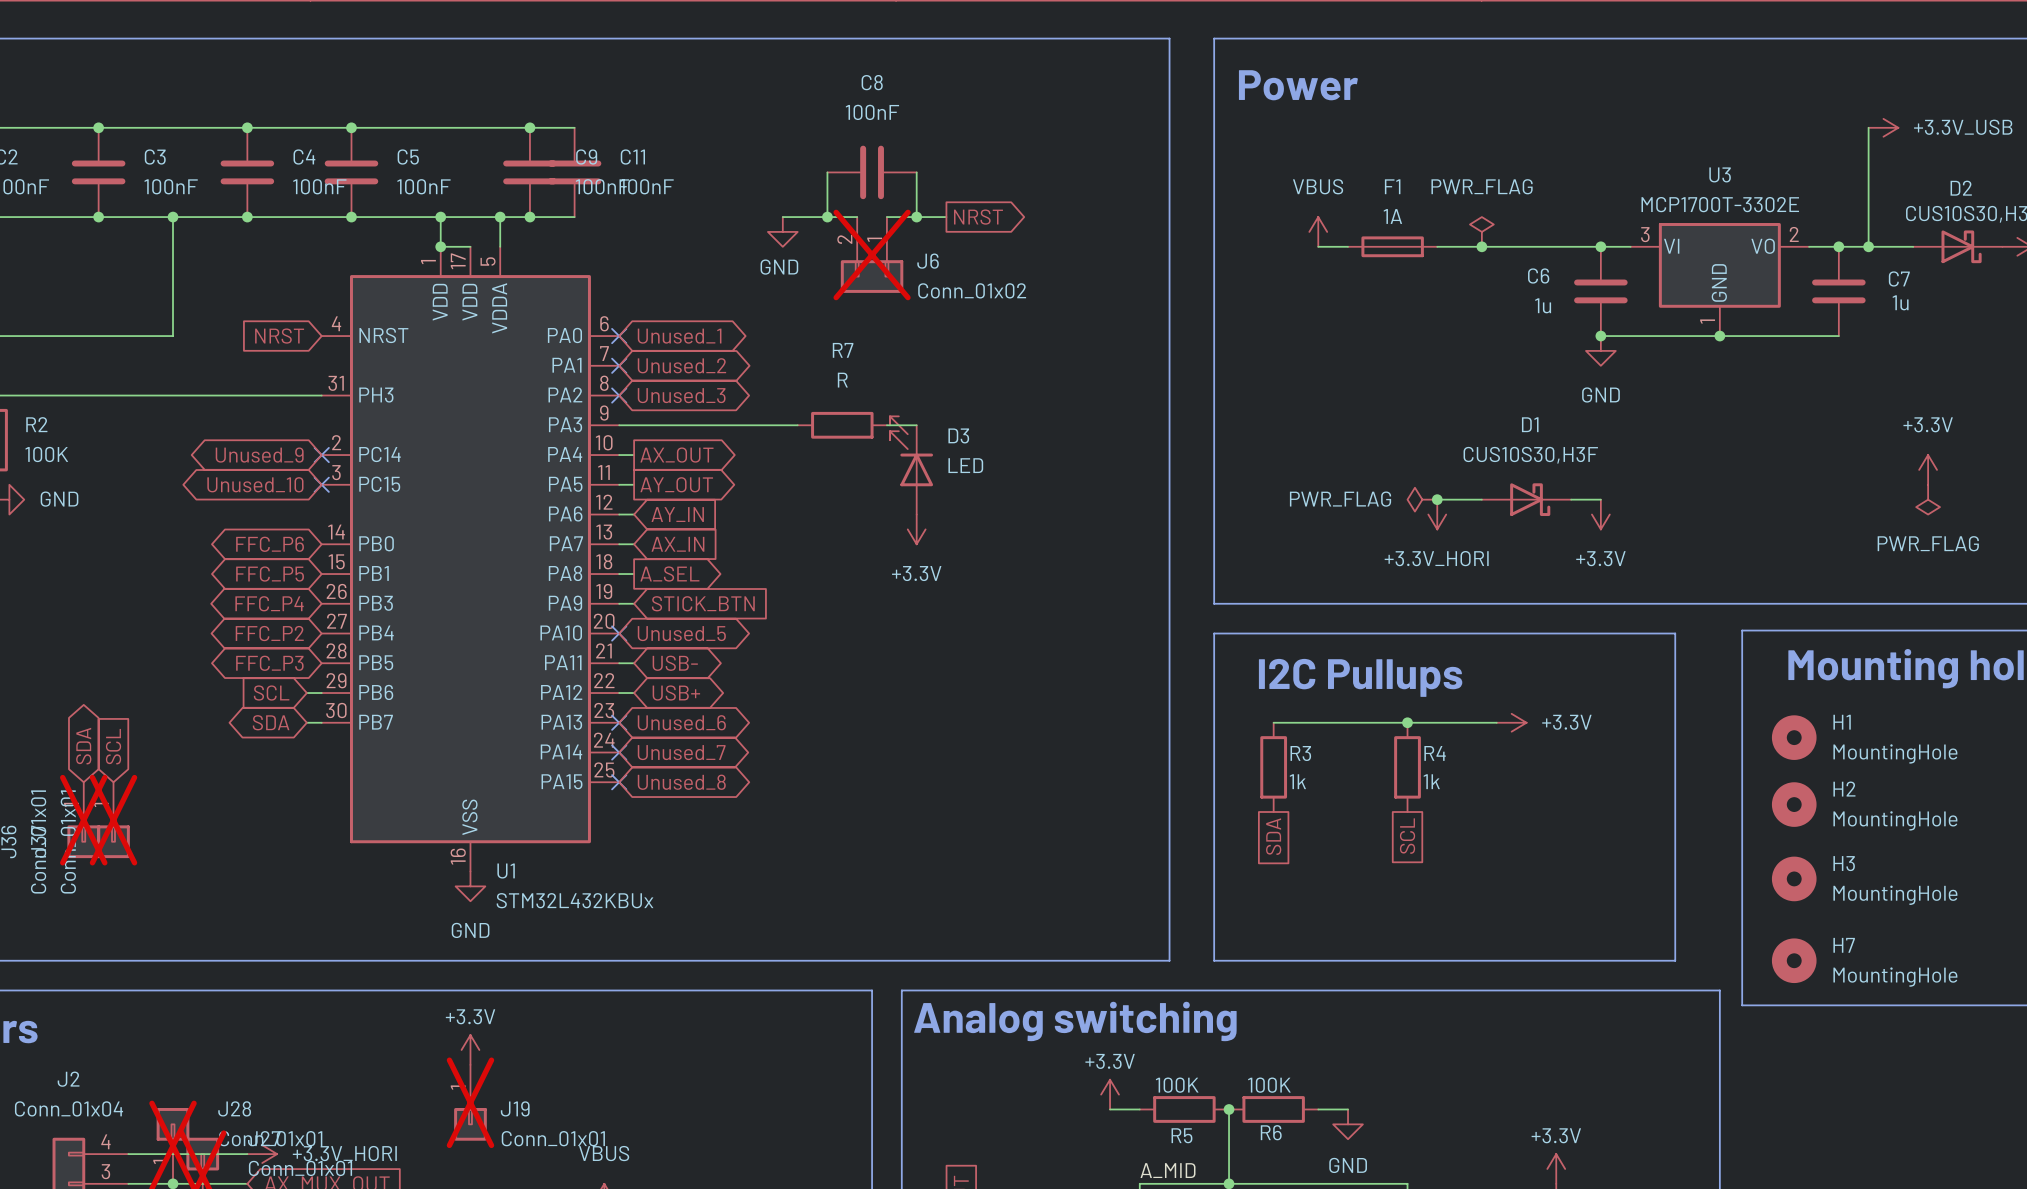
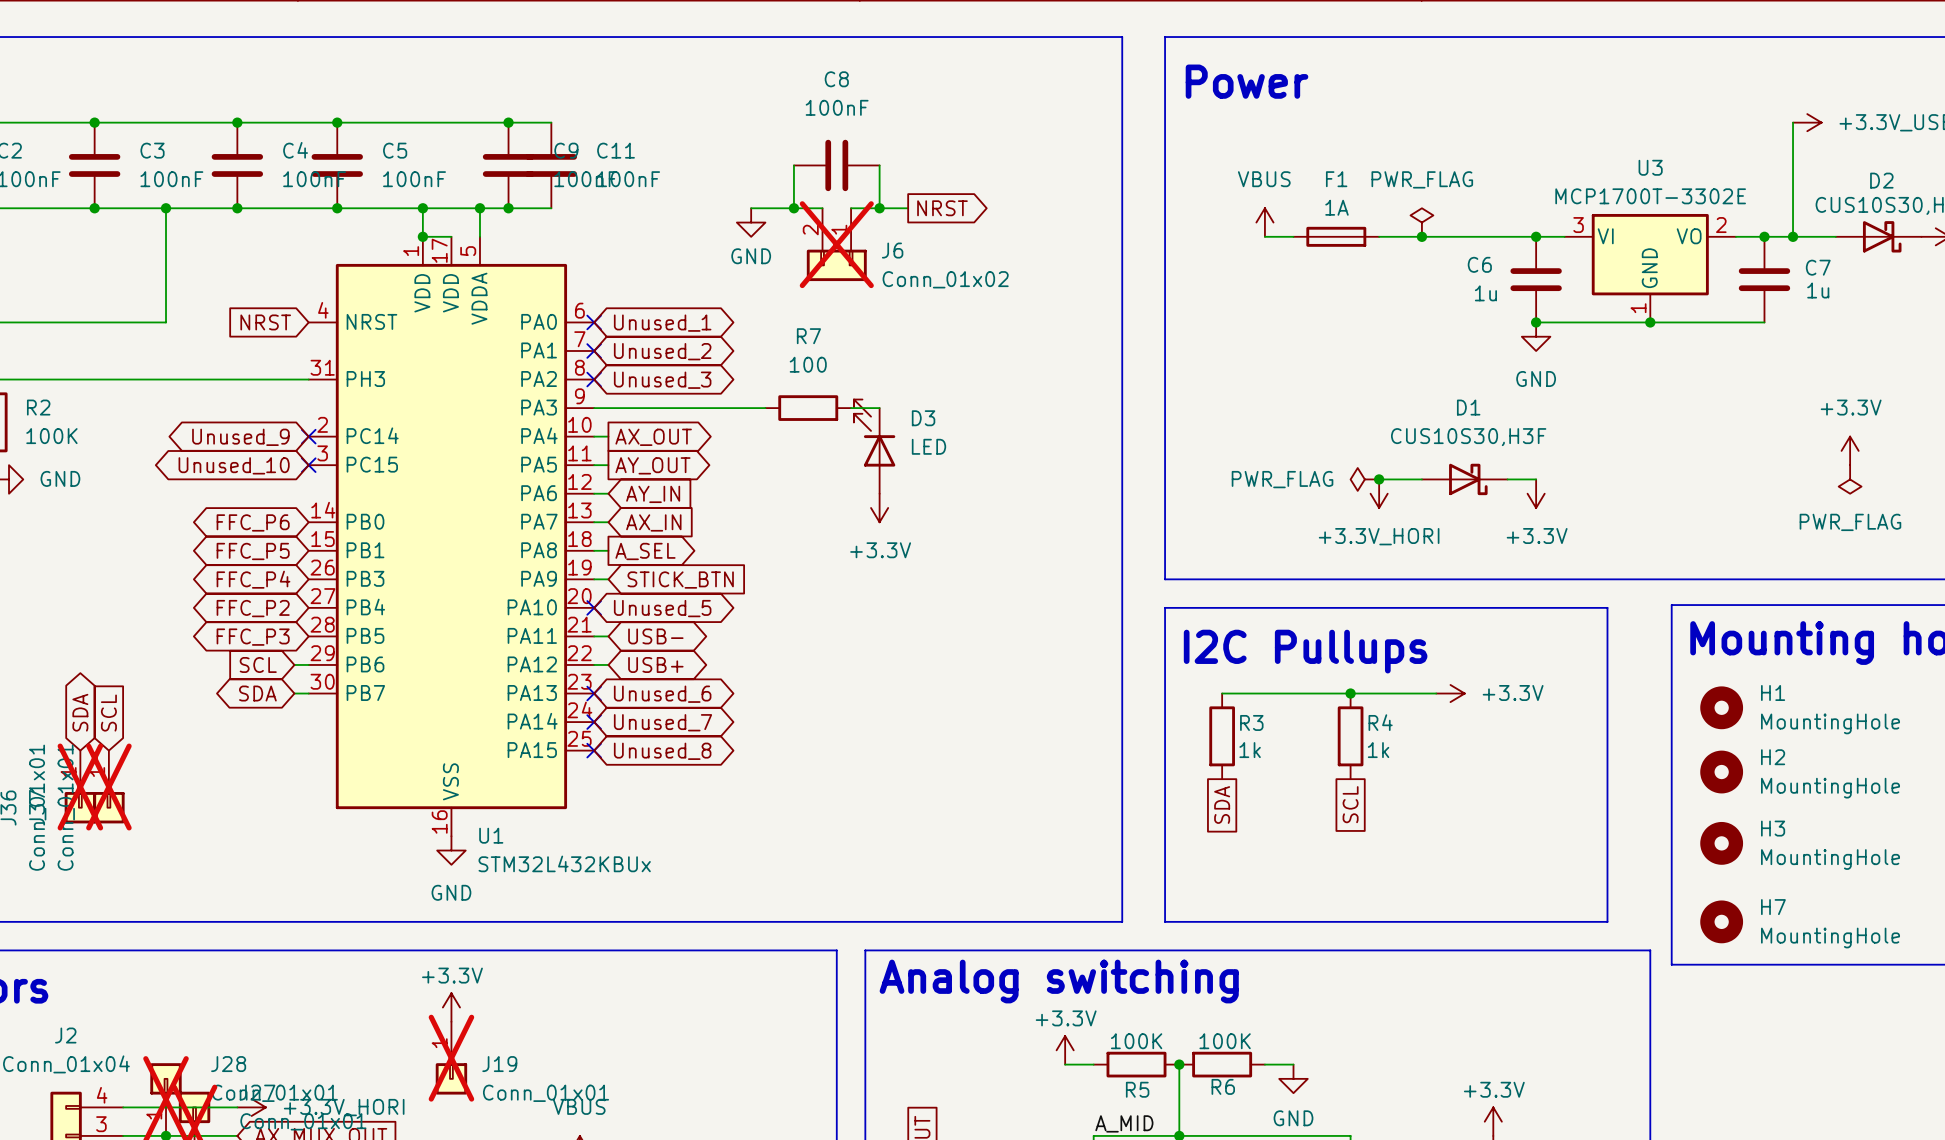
R7 value: R (842, 380) -> 100 (808, 364)

